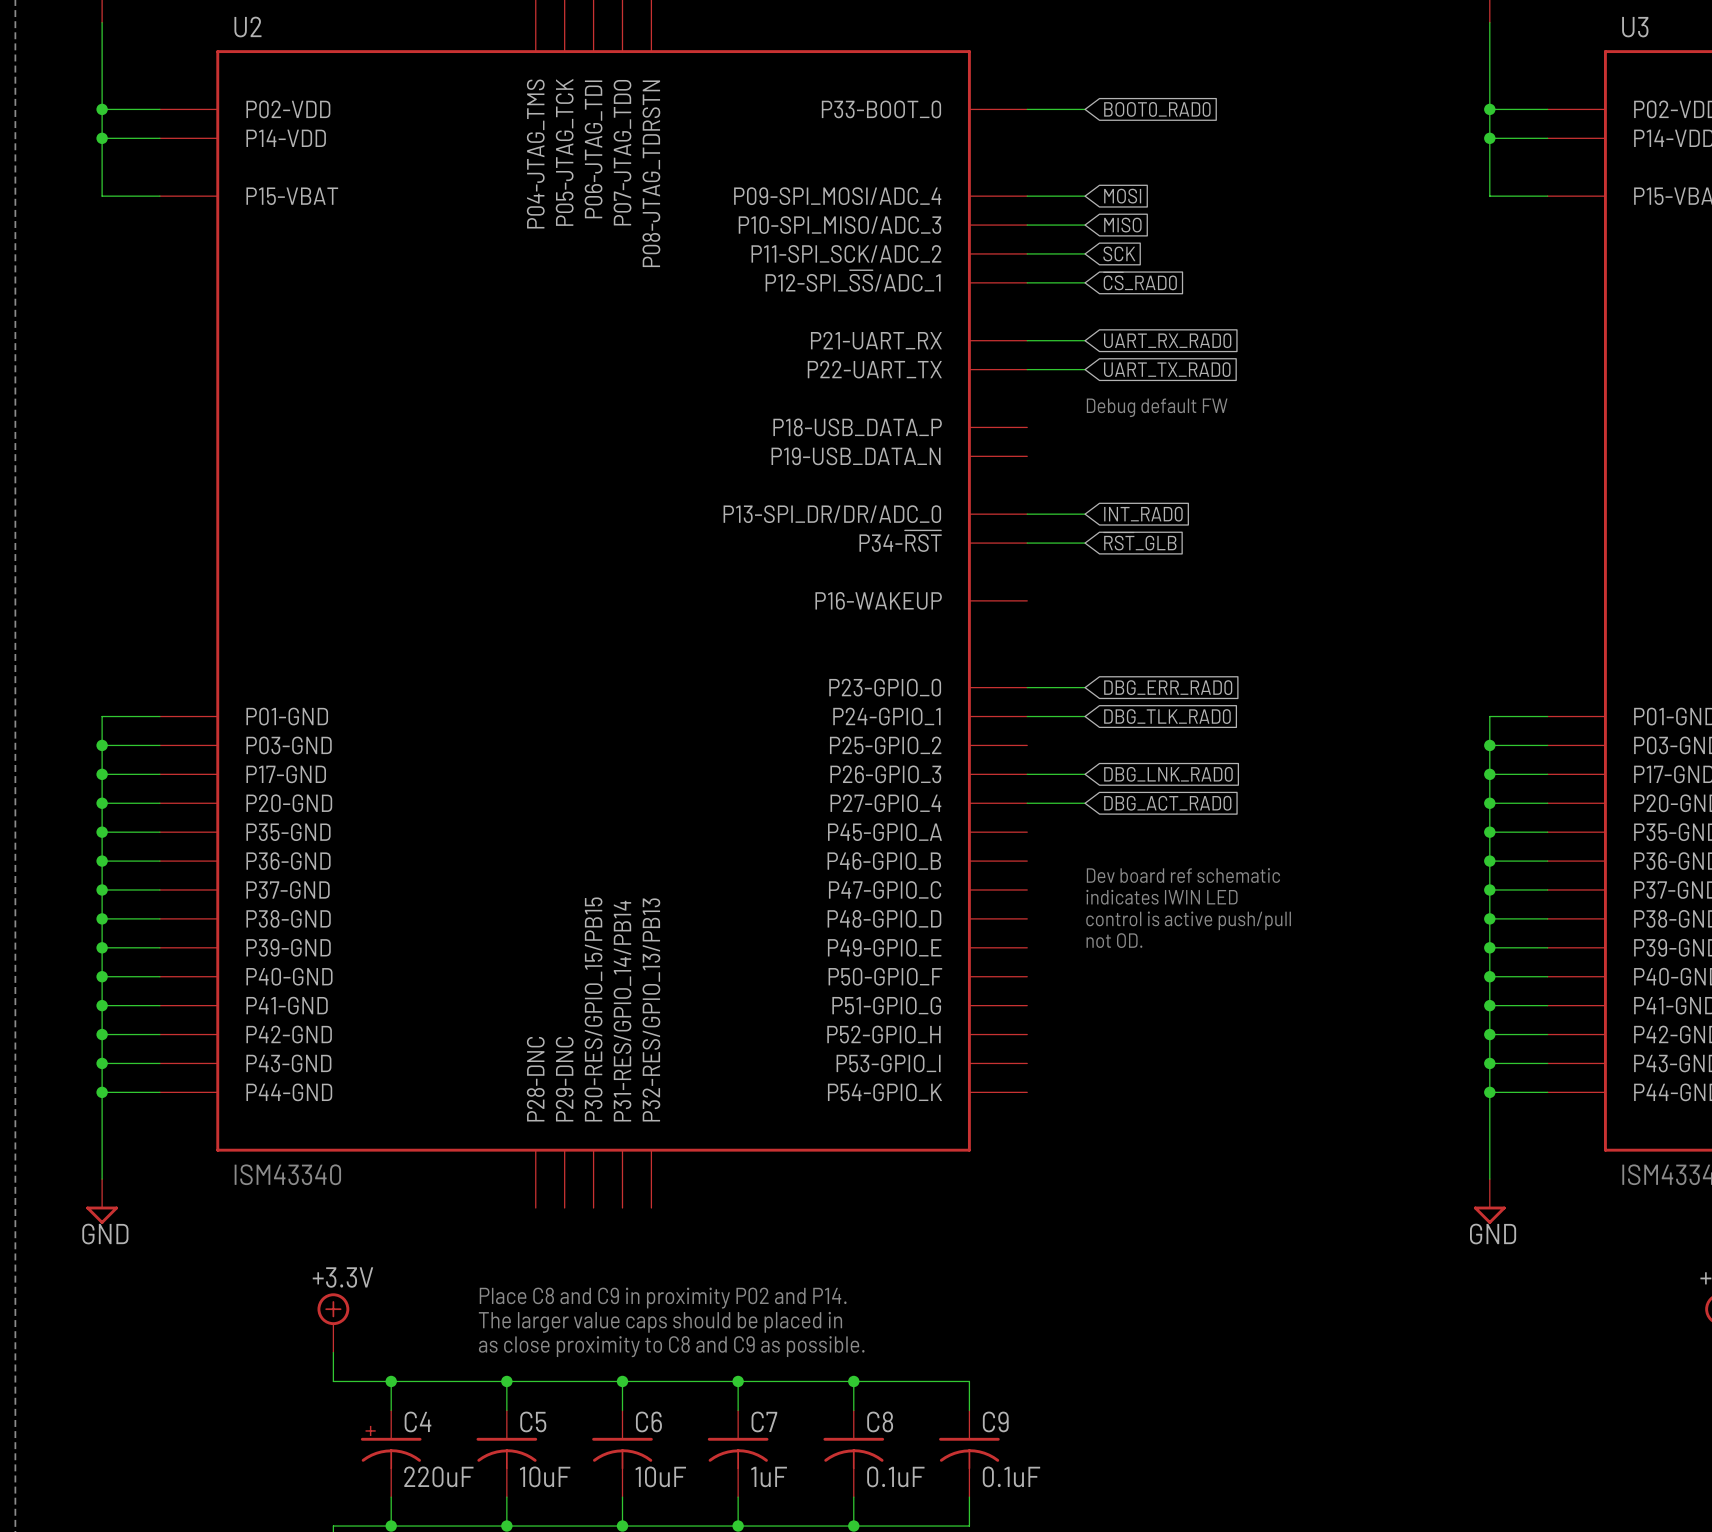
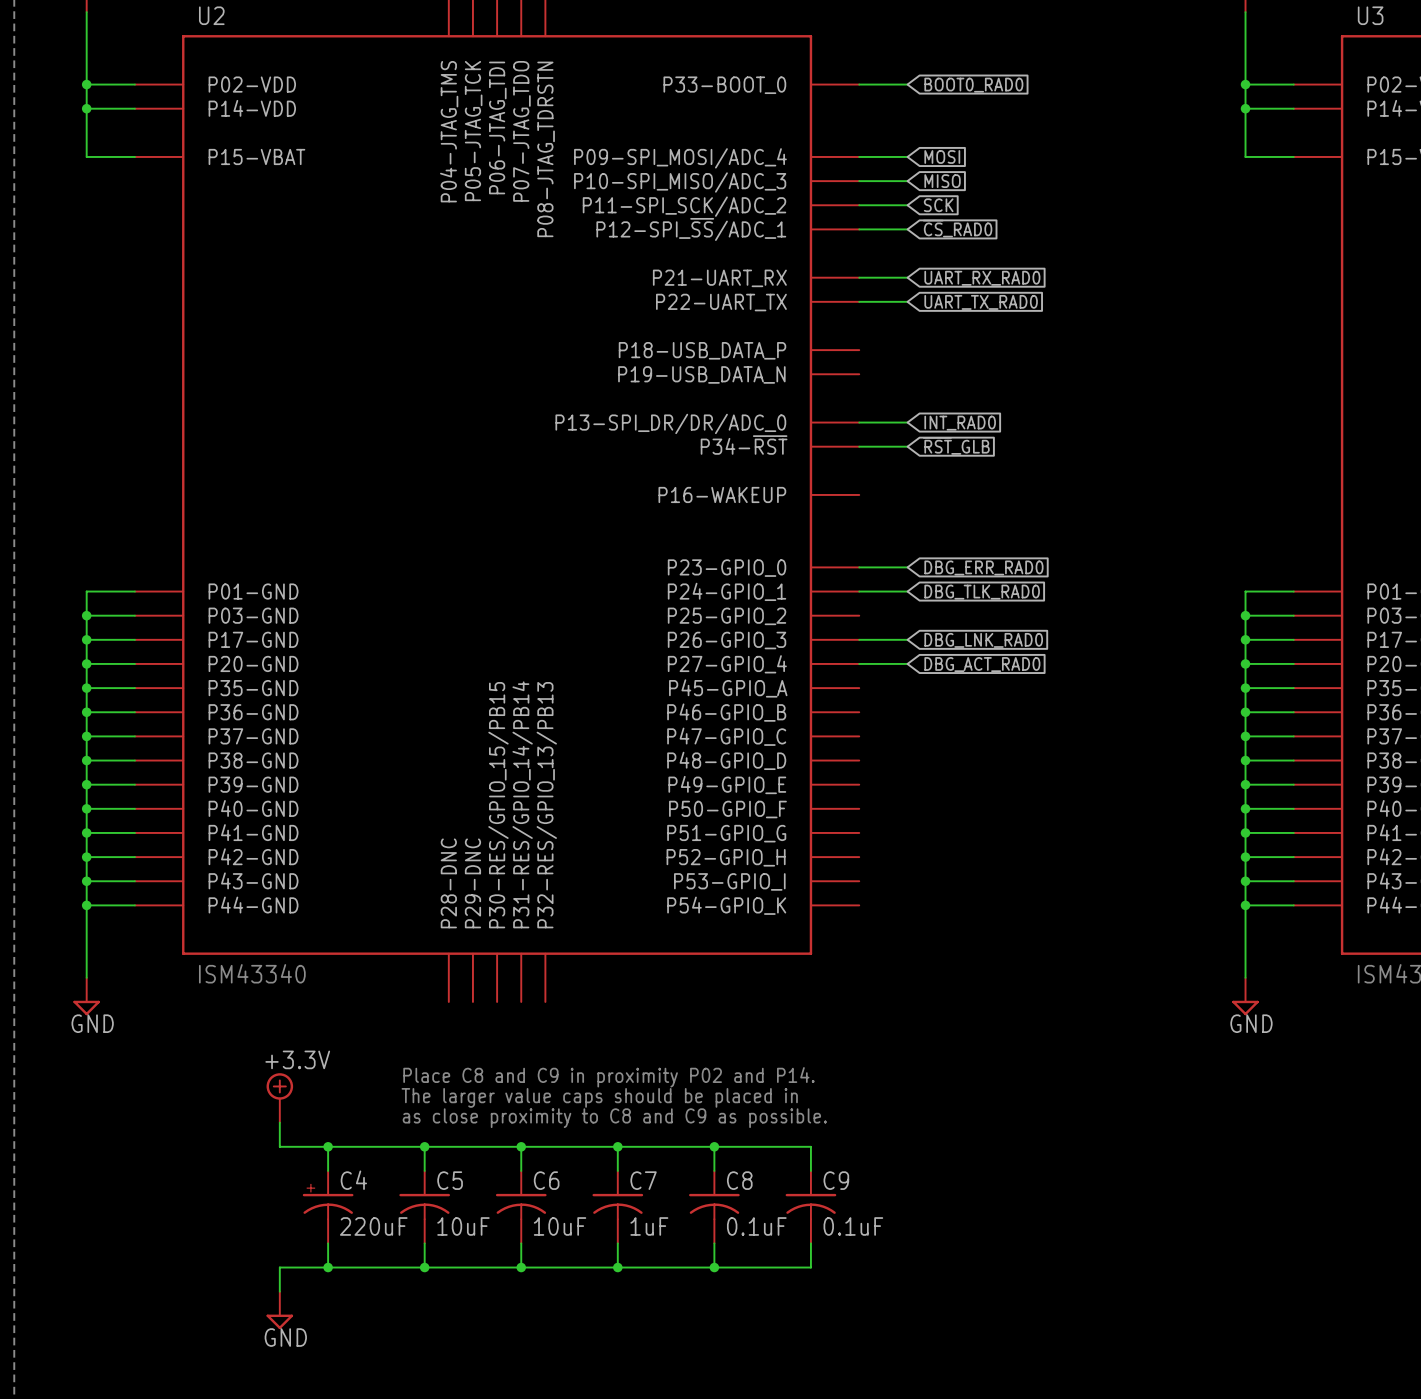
text: Debug default FW (1157, 407) -> none
text: Dev board ref schematic (1183, 875) -> none
text: indicates IWIN LED (1161, 897) -> none
text: control is active push/pull (1188, 920) -> none
text: not OD. (1114, 940) -> none

